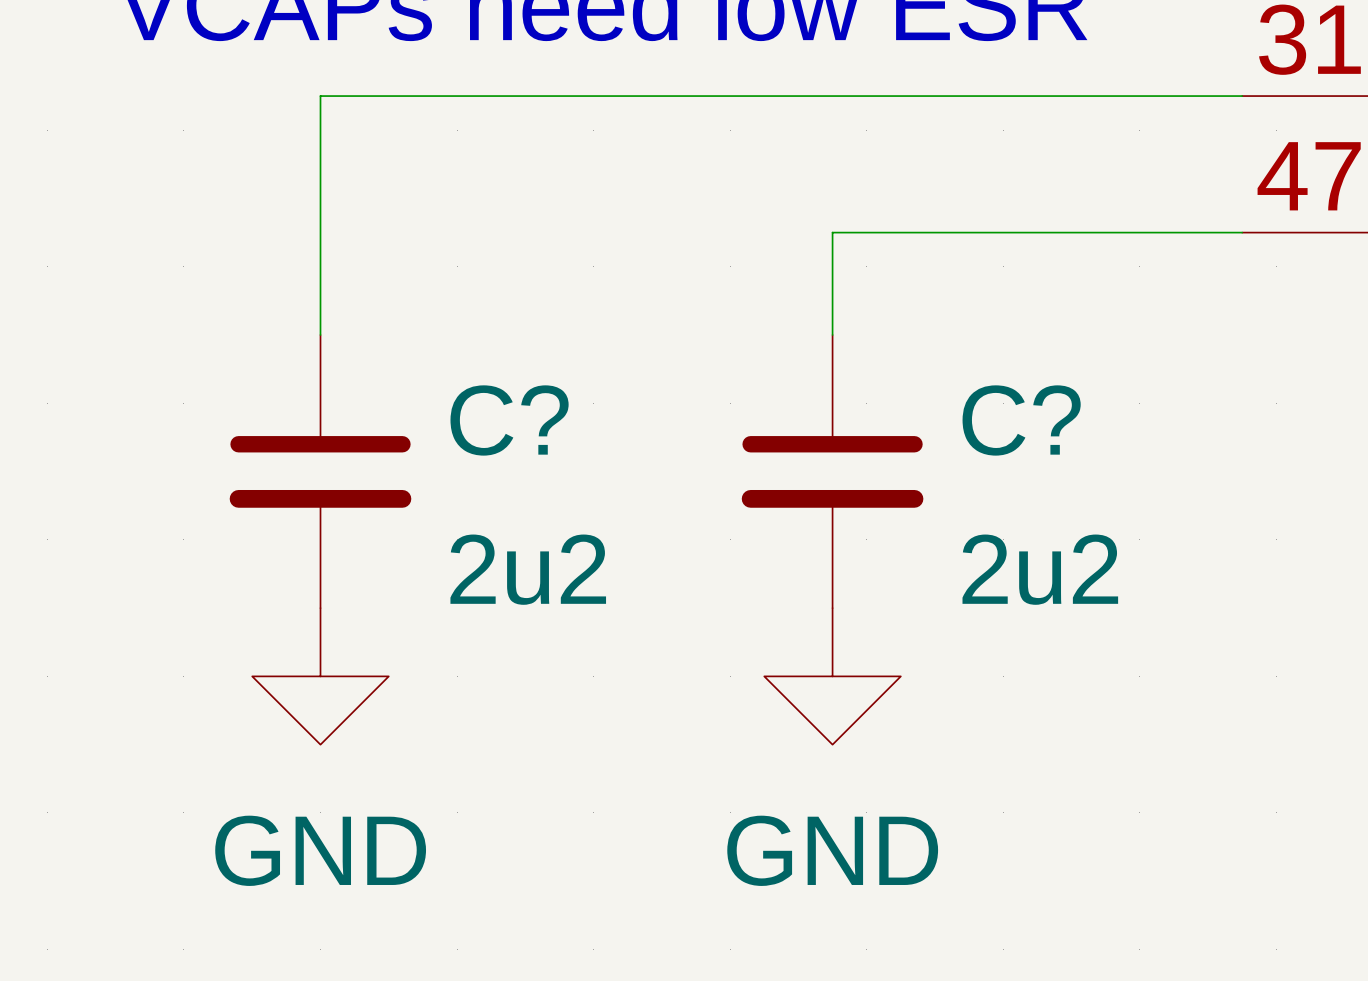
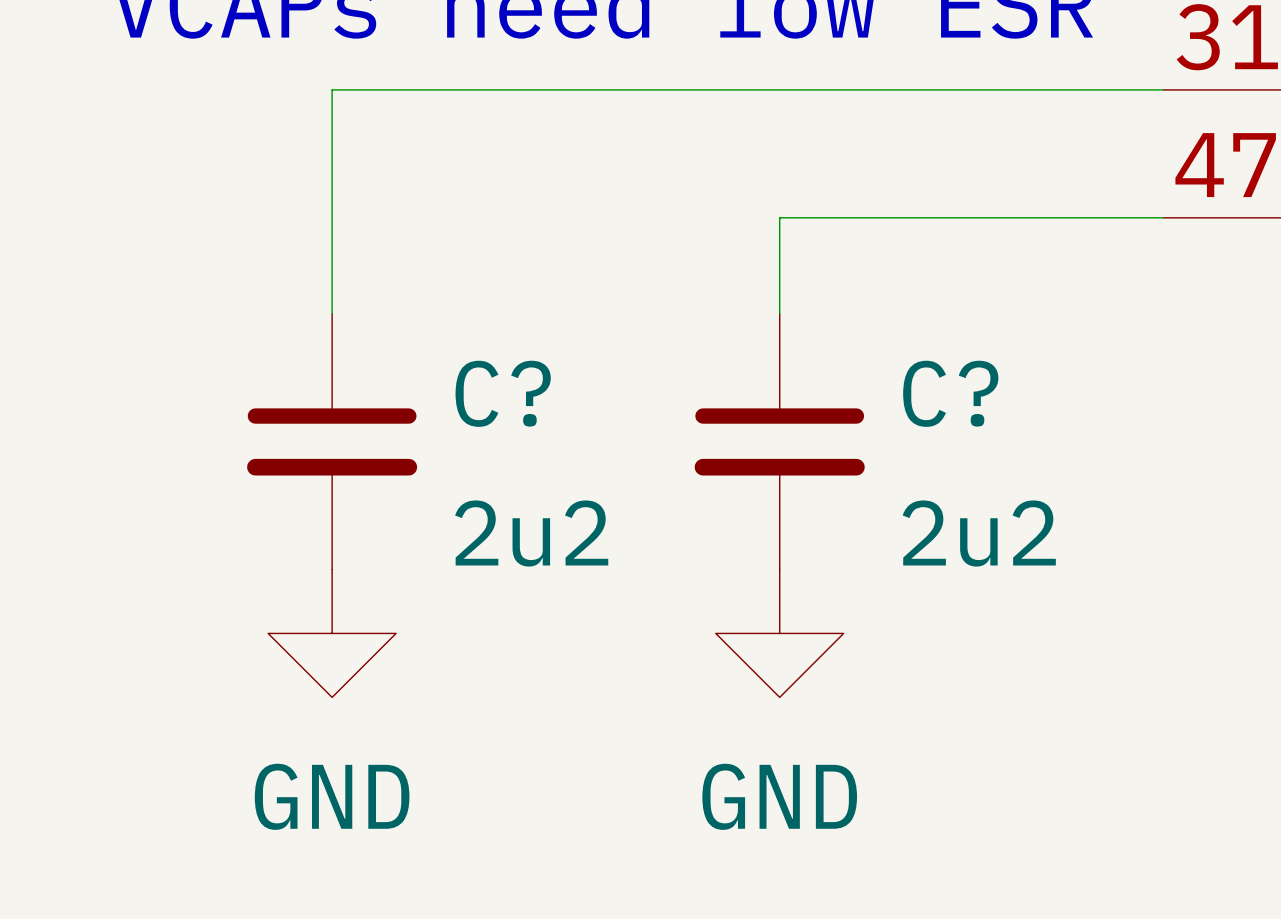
wire: (354, 96) (320, 96) (320, 335) -> (332, 89) (332, 313)
C? position: (320, 471) -> (332, 441)
power symbol position: GND (320, 676) -> GND (332, 633)

